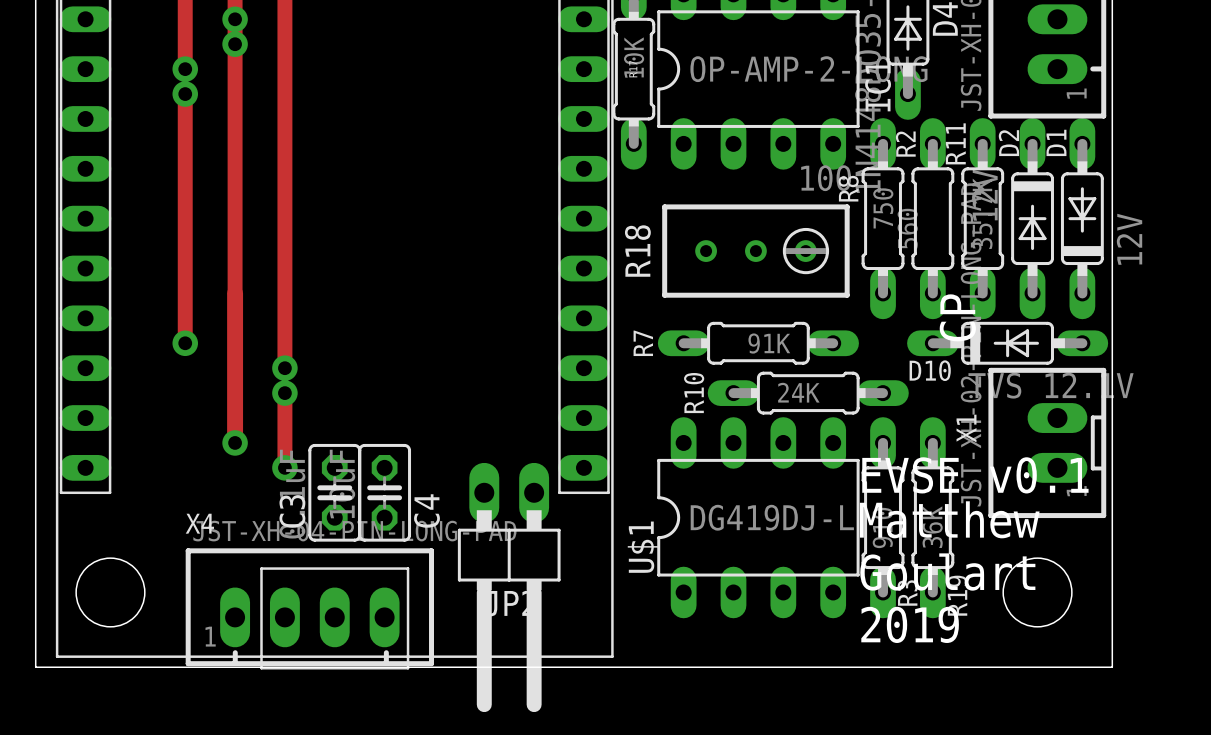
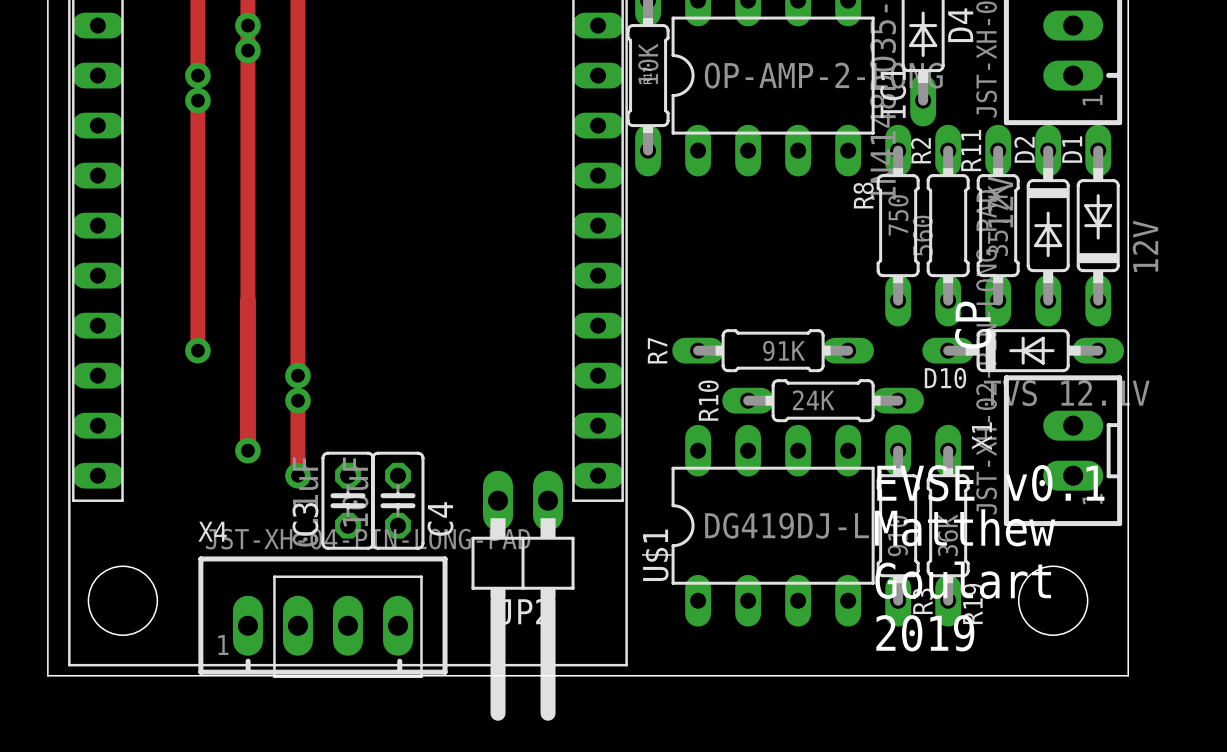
R18: 100 (755, 251) -> none

